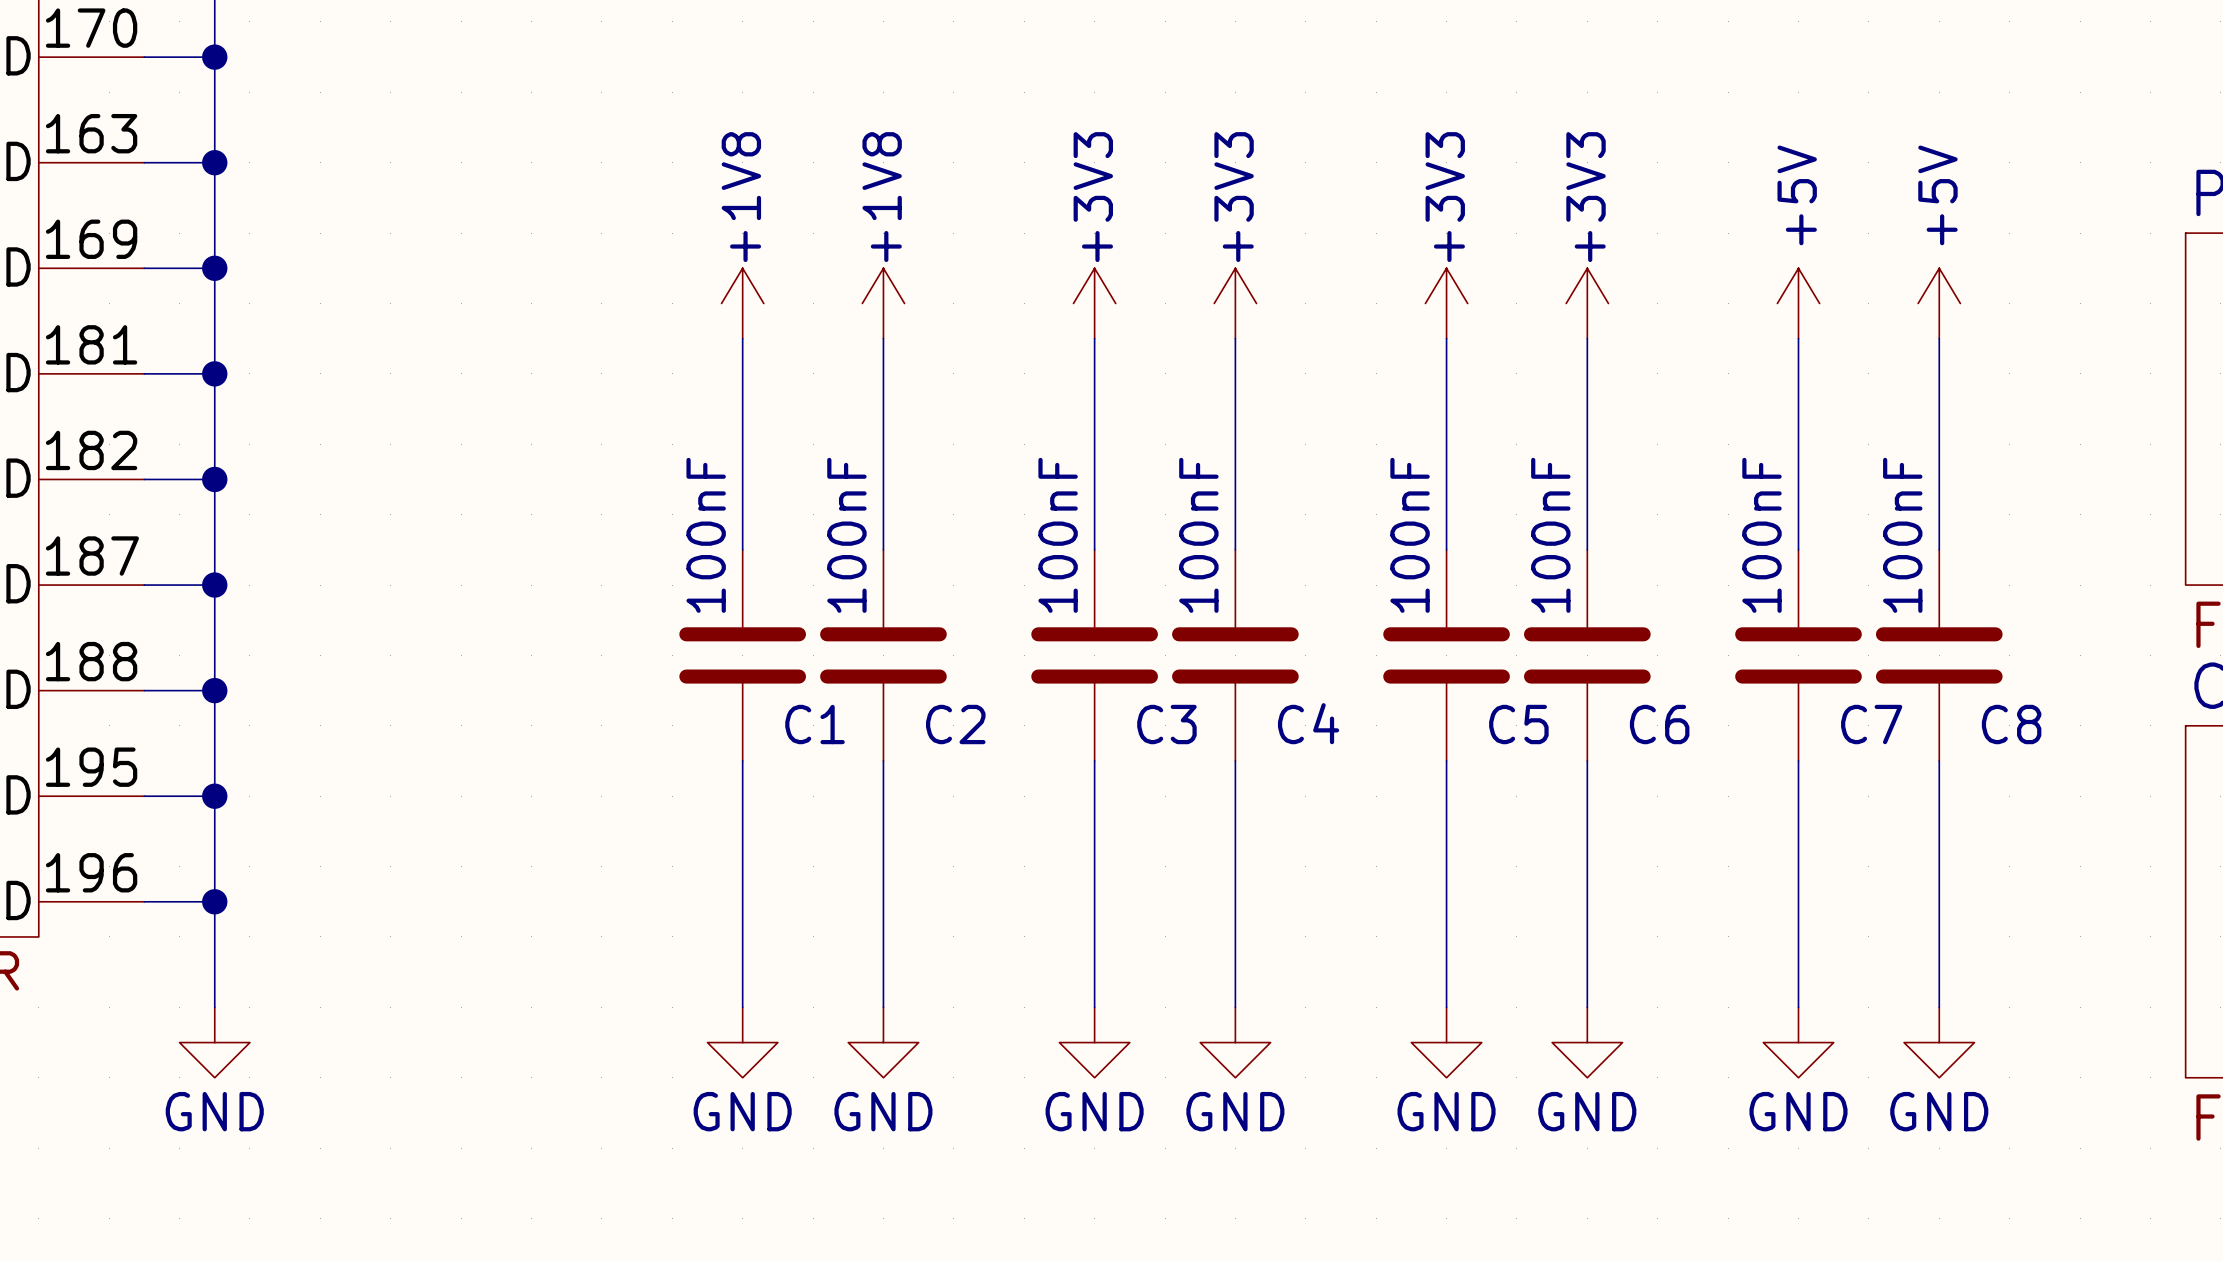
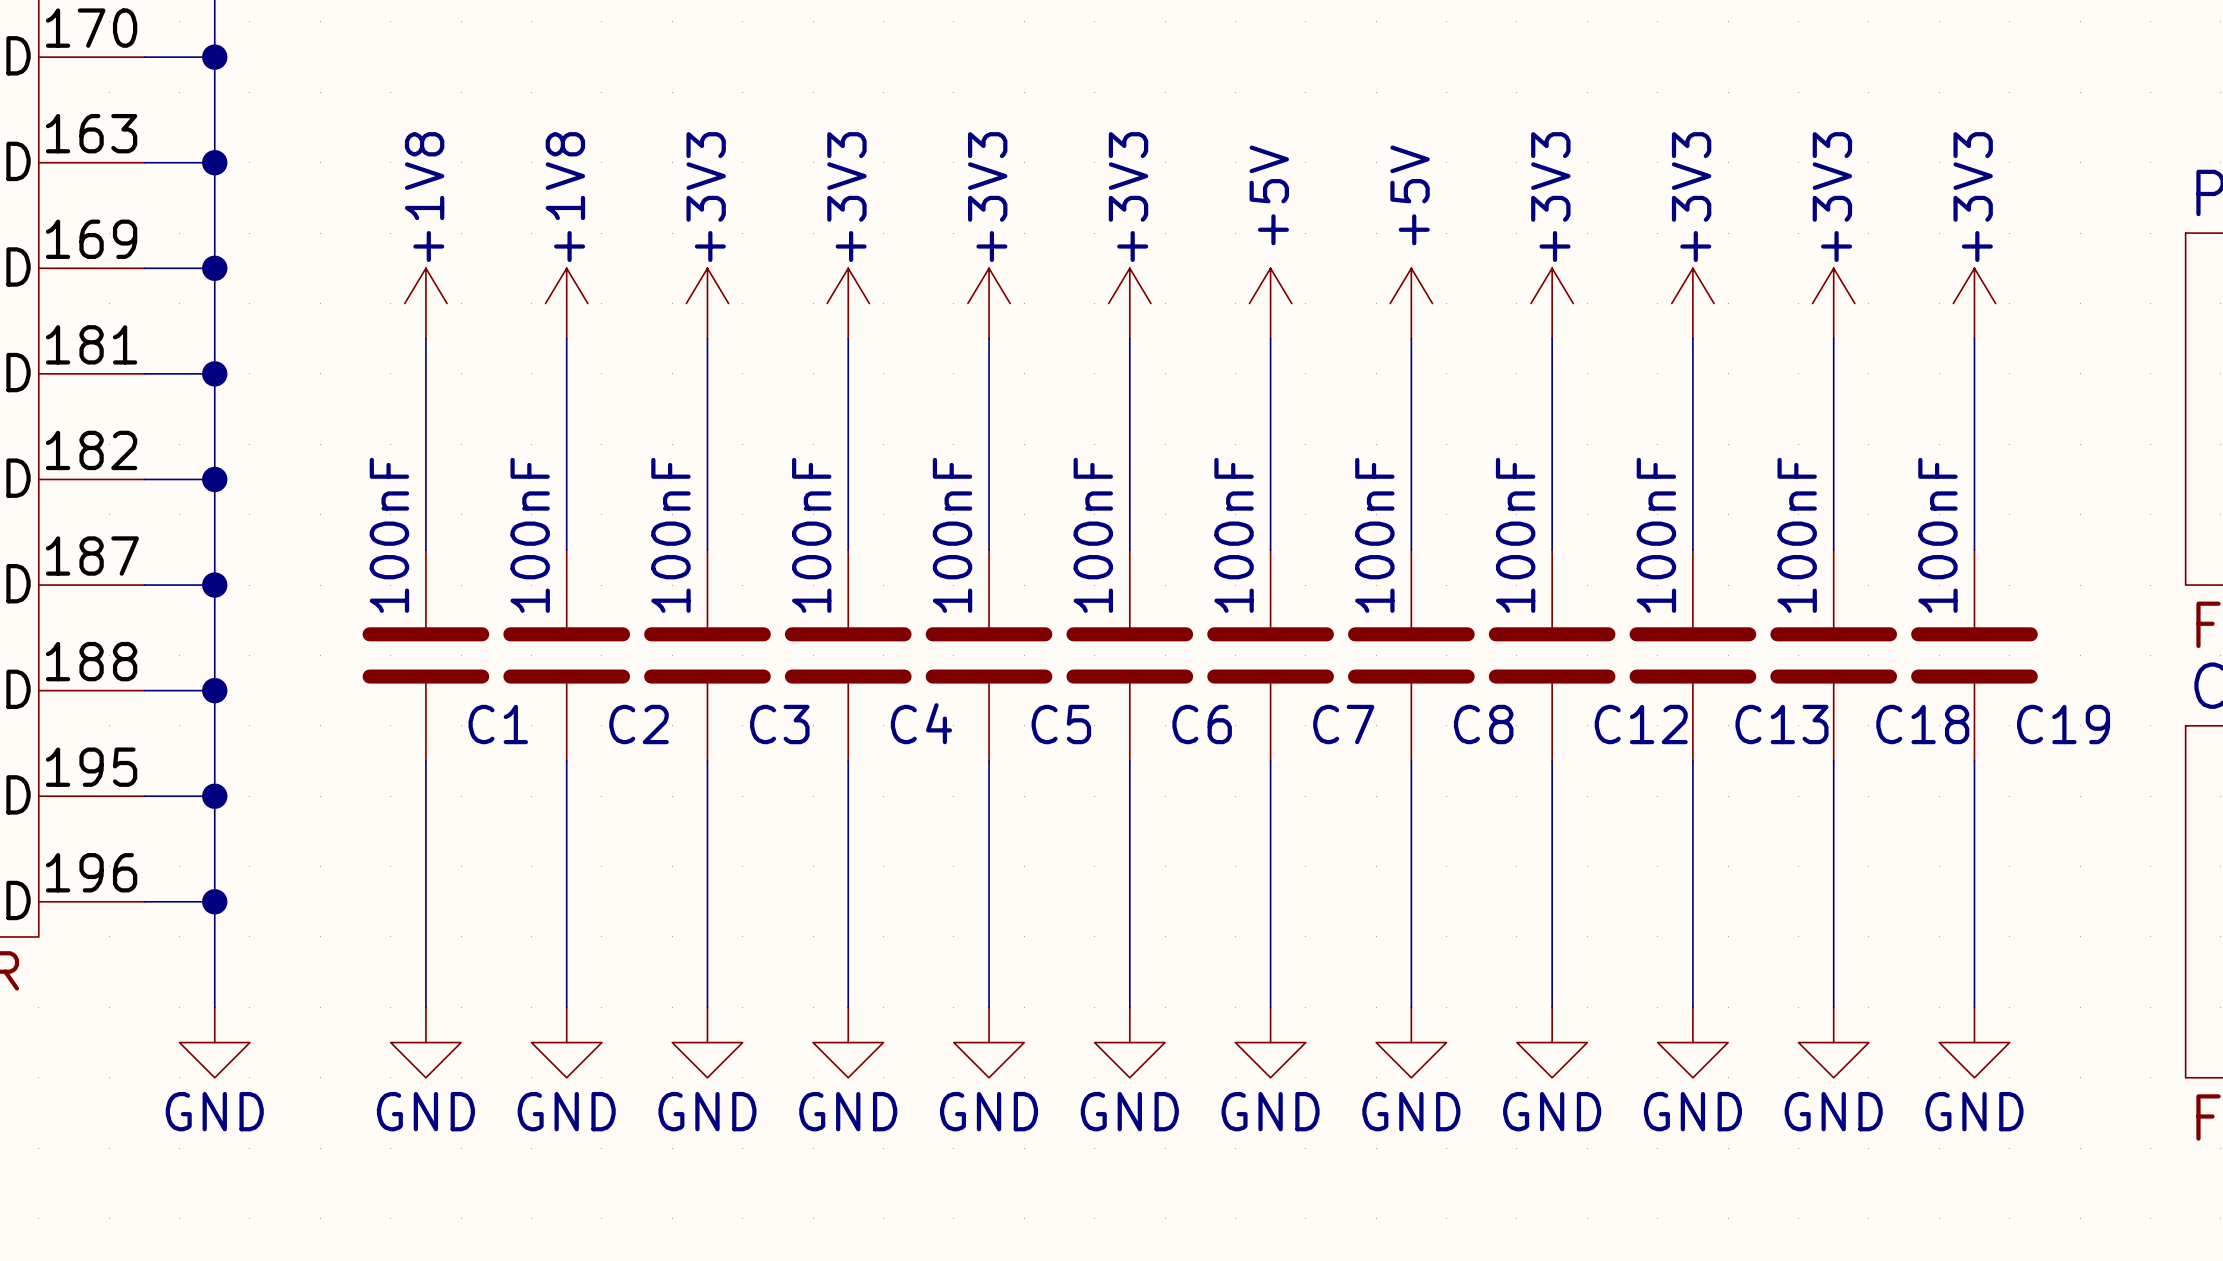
power symbol: none -> +1V8 (425, 303)
power symbol: none -> +1V8 (566, 303)
power symbol: none -> +3V3 (707, 303)
power symbol: +1V8 (742, 303) -> none
power symbol: none -> +3V3 (848, 303)
power symbol: +1V8 (883, 303) -> none
power symbol: none -> +3V3 (989, 303)
power symbol position: +3V3 (1094, 303) -> +3V3 (1129, 303)
power symbol: +3V3 (1235, 303) -> none
power symbol: none -> +5V (1270, 303)
power symbol: none -> +5V (1411, 303)
power symbol: +3V3 (1446, 303) -> none
power symbol position: +3V3 (1587, 303) -> +3V3 (1552, 303)
power symbol: none -> +3V3 (1692, 303)
power symbol: +5V (1798, 303) -> none
power symbol: none -> +3V3 (1833, 303)
power symbol: +5V (1939, 303) -> none
power symbol: none -> +3V3 (1974, 303)
wire: none -> (425, 338) (425, 549)
wire: none -> (566, 338) (566, 549)
wire: (742, 338) (742, 549) -> (707, 338) (707, 549)
wire: (883, 338) (883, 549) -> (848, 338) (848, 549)
wire: none -> (989, 338) (989, 549)
wire: (1094, 338) (1094, 549) -> (1129, 338) (1129, 549)
wire: (1235, 338) (1235, 549) -> (1270, 338) (1270, 549)
wire: (1446, 338) (1446, 549) -> (1411, 338) (1411, 549)
wire: (1587, 338) (1587, 549) -> (1552, 338) (1552, 549)
wire: none -> (1692, 338) (1692, 549)
wire: (1798, 338) (1798, 549) -> (1833, 338) (1833, 549)
wire: (1939, 338) (1939, 549) -> (1974, 338) (1974, 549)
C1 position: (742, 655) -> (425, 655)
C2 position: (883, 655) -> (566, 655)
C3 position: (1094, 655) -> (707, 655)
C4 position: (1235, 655) -> (848, 655)
C5 position: (1446, 655) -> (989, 655)
C12: none -> 100nF (1552, 655)
C6 position: (1587, 655) -> (1129, 655)
C13: none -> 100nF (1692, 655)
C7 position: (1798, 655) -> (1270, 655)
C18: none -> 100nF (1833, 655)
C8 position: (1939, 655) -> (1411, 655)
C19: none -> 100nF (1974, 655)
wire: none -> (425, 761) (425, 1007)
wire: none -> (566, 761) (566, 1007)
wire: (742, 761) (742, 1007) -> (707, 761) (707, 1007)
wire: (883, 761) (883, 1007) -> (848, 761) (848, 1007)
wire: none -> (989, 761) (989, 1007)
wire: (1094, 761) (1094, 1007) -> (1129, 761) (1129, 1007)
wire: (1235, 761) (1235, 1007) -> (1270, 761) (1270, 1007)
wire: (1446, 761) (1446, 1007) -> (1411, 761) (1411, 1007)
wire: (1587, 761) (1587, 1007) -> (1552, 761) (1552, 1007)
wire: none -> (1692, 761) (1692, 1007)
wire: (1798, 761) (1798, 1007) -> (1833, 761) (1833, 1007)
wire: (1939, 761) (1939, 1007) -> (1974, 761) (1974, 1007)
power symbol: none -> GND (425, 1042)
power symbol: none -> GND (566, 1042)
power symbol position: GND (742, 1042) -> GND (707, 1042)
power symbol position: GND (883, 1042) -> GND (848, 1042)
power symbol: none -> GND (989, 1042)
power symbol position: GND (1094, 1042) -> GND (1129, 1042)
power symbol position: GND (1235, 1042) -> GND (1270, 1042)
power symbol position: GND (1446, 1042) -> GND (1411, 1042)
power symbol position: GND (1587, 1042) -> GND (1552, 1042)
power symbol: none -> GND (1692, 1042)
power symbol position: GND (1798, 1042) -> GND (1833, 1042)
power symbol position: GND (1939, 1042) -> GND (1974, 1042)

